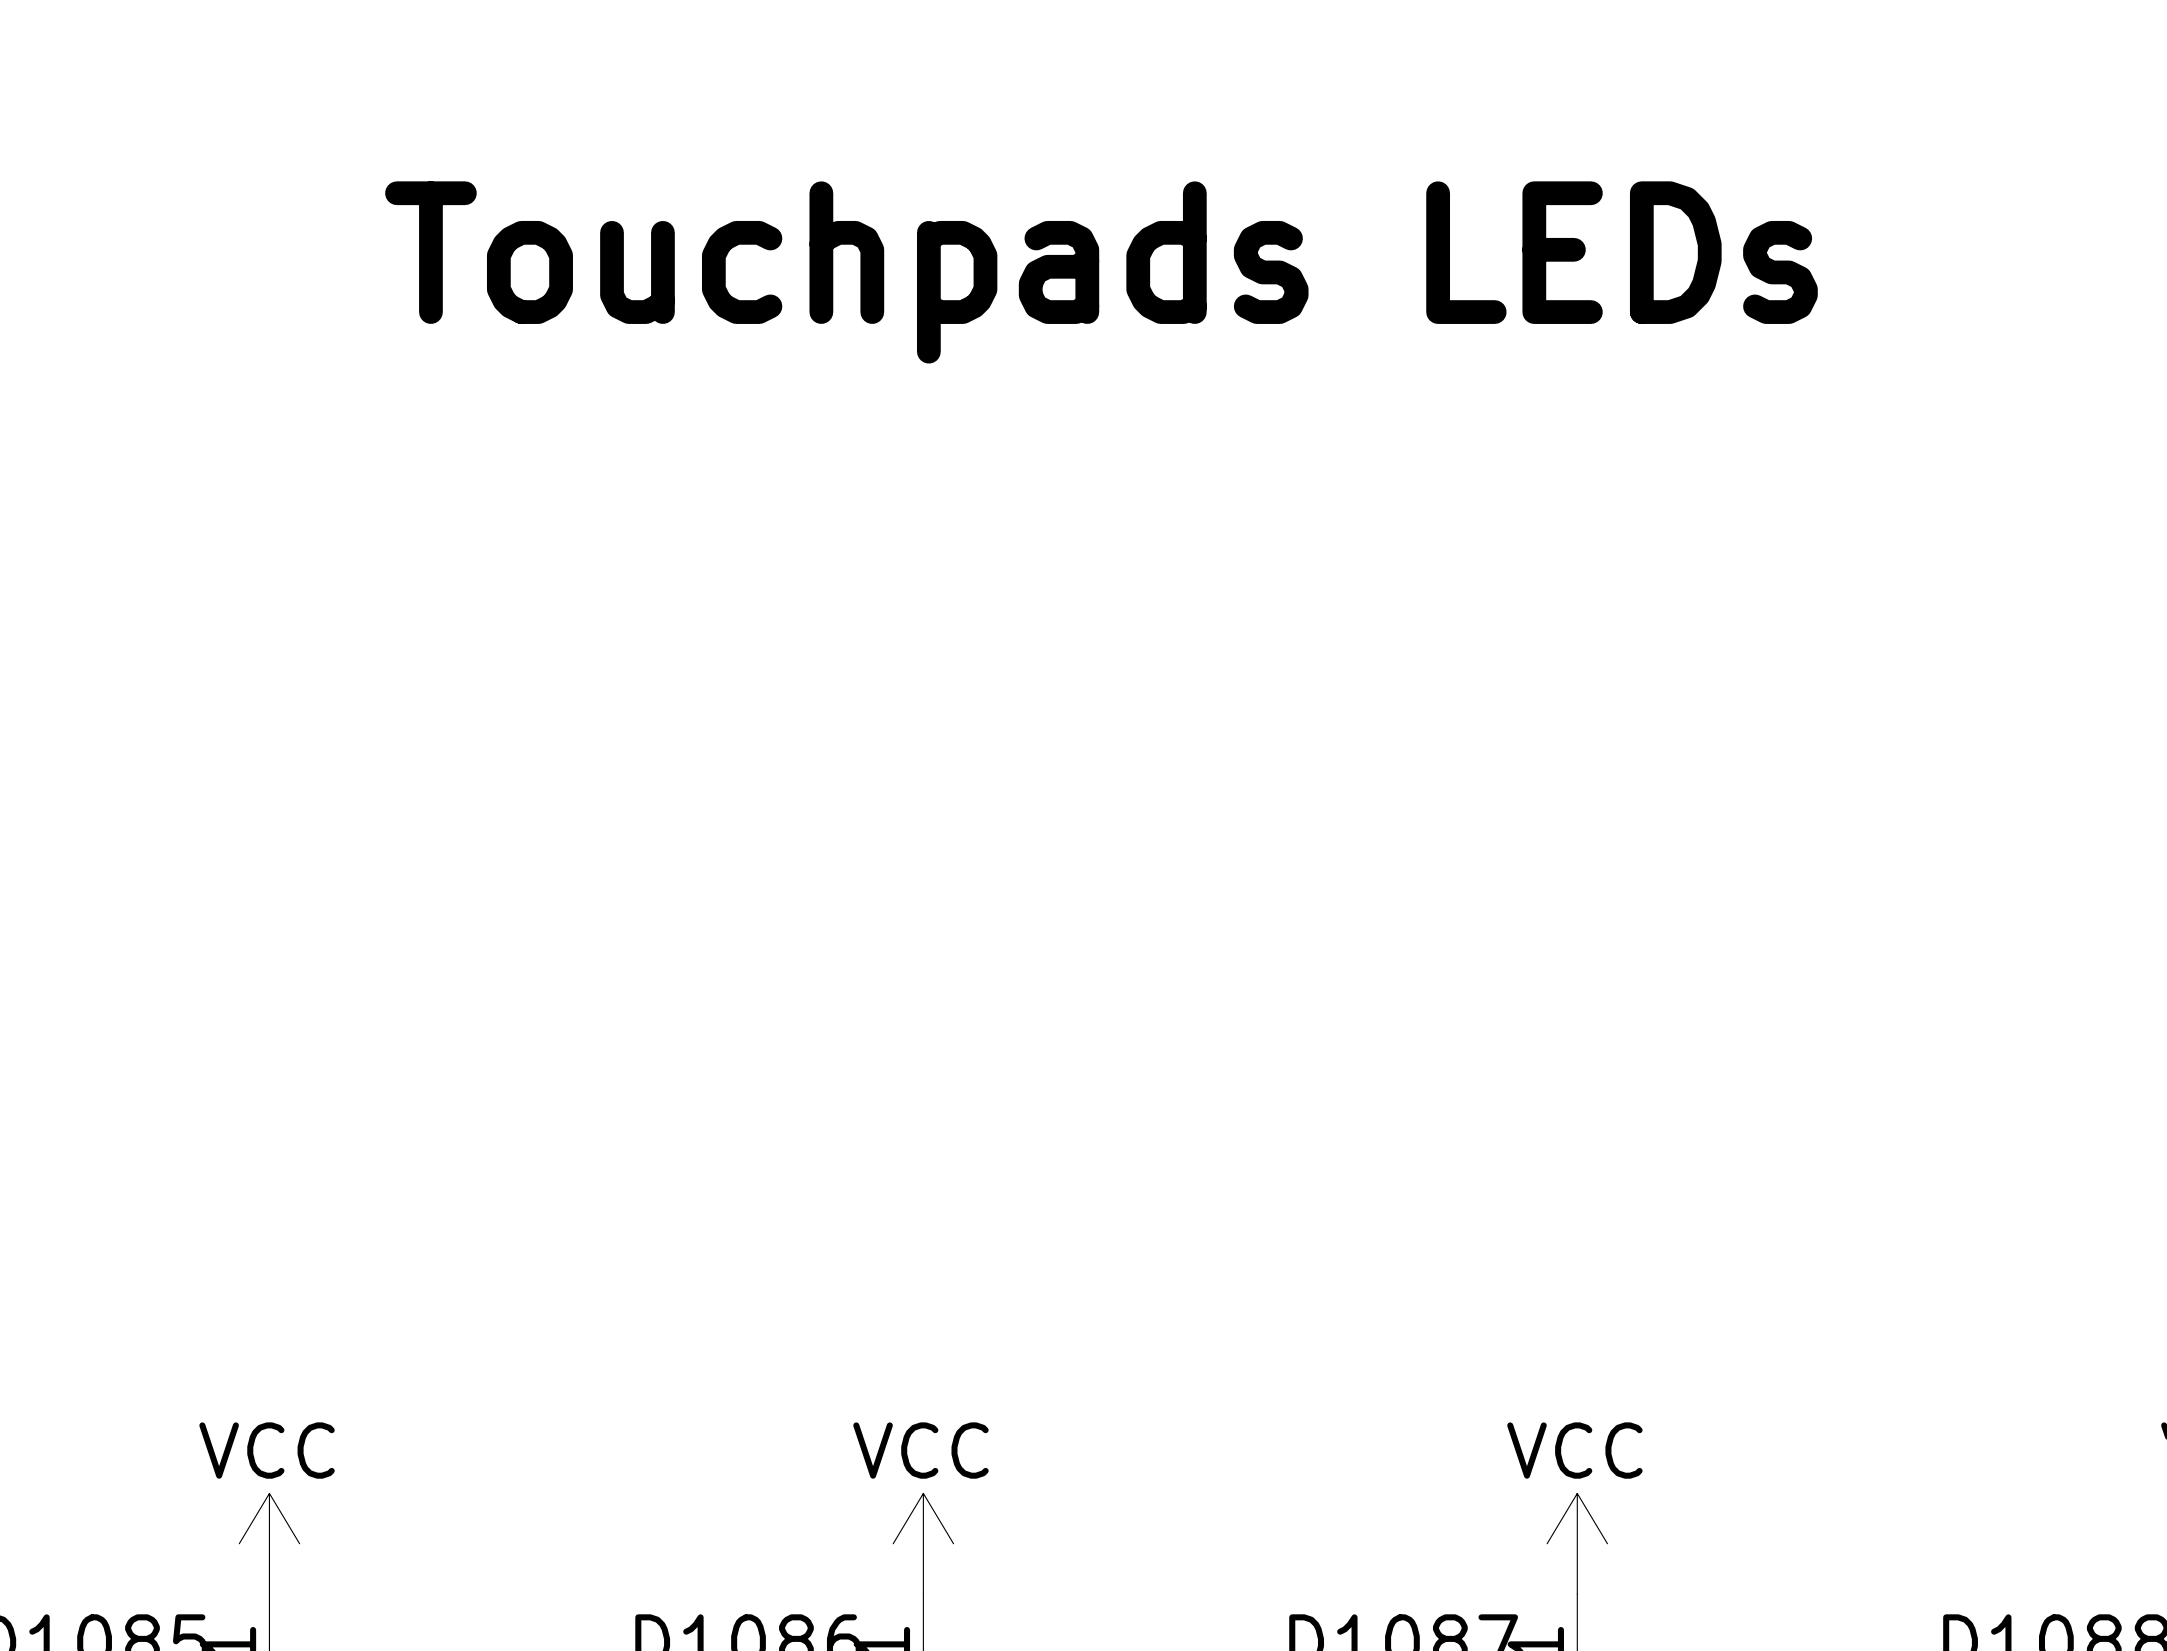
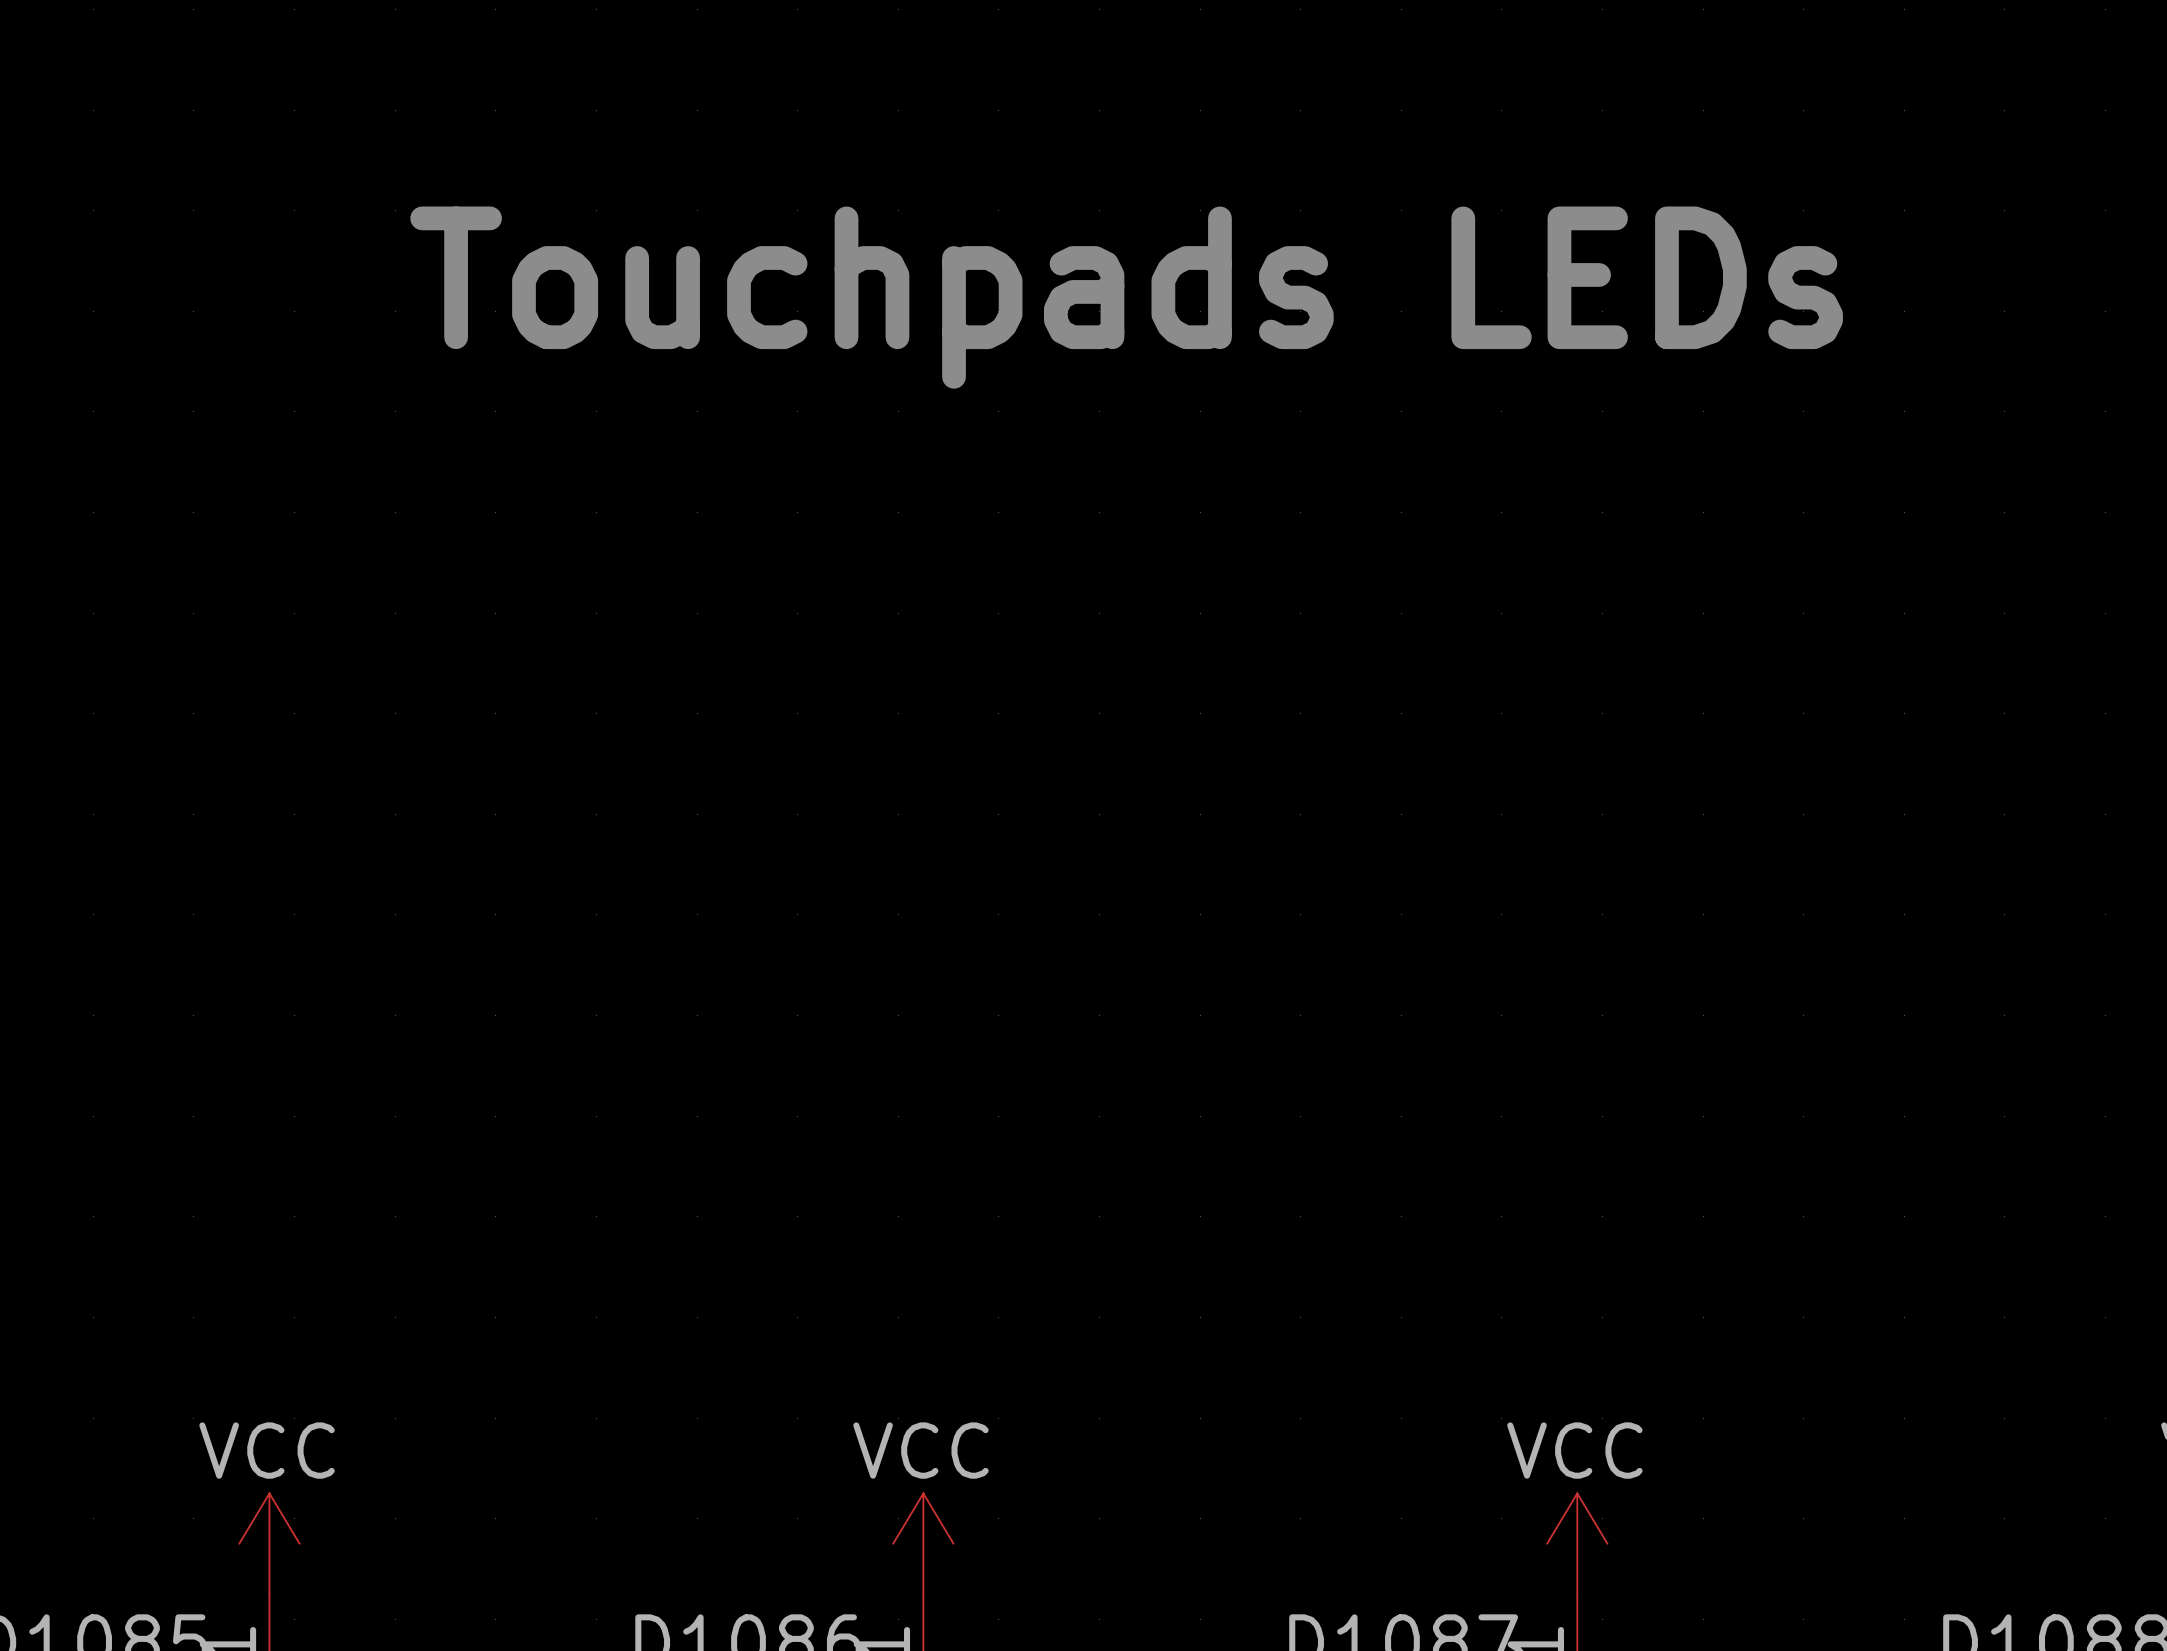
text position: Touchpads LEDs (1101, 272) -> Touchpads LEDs (1126, 297)

